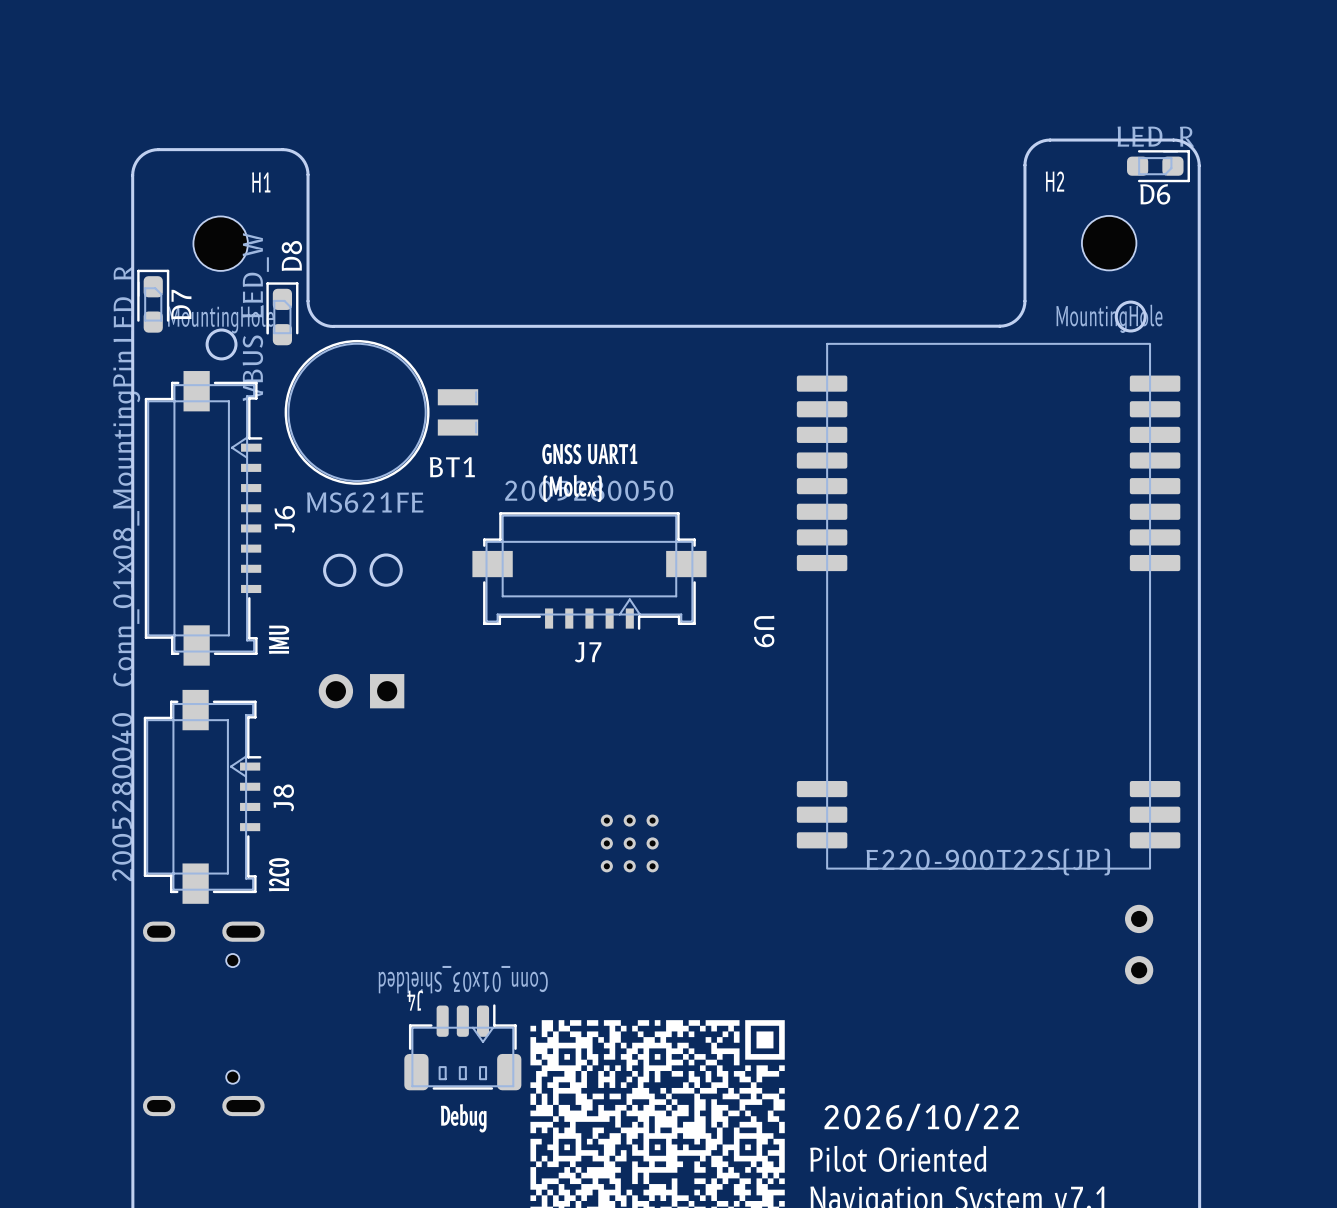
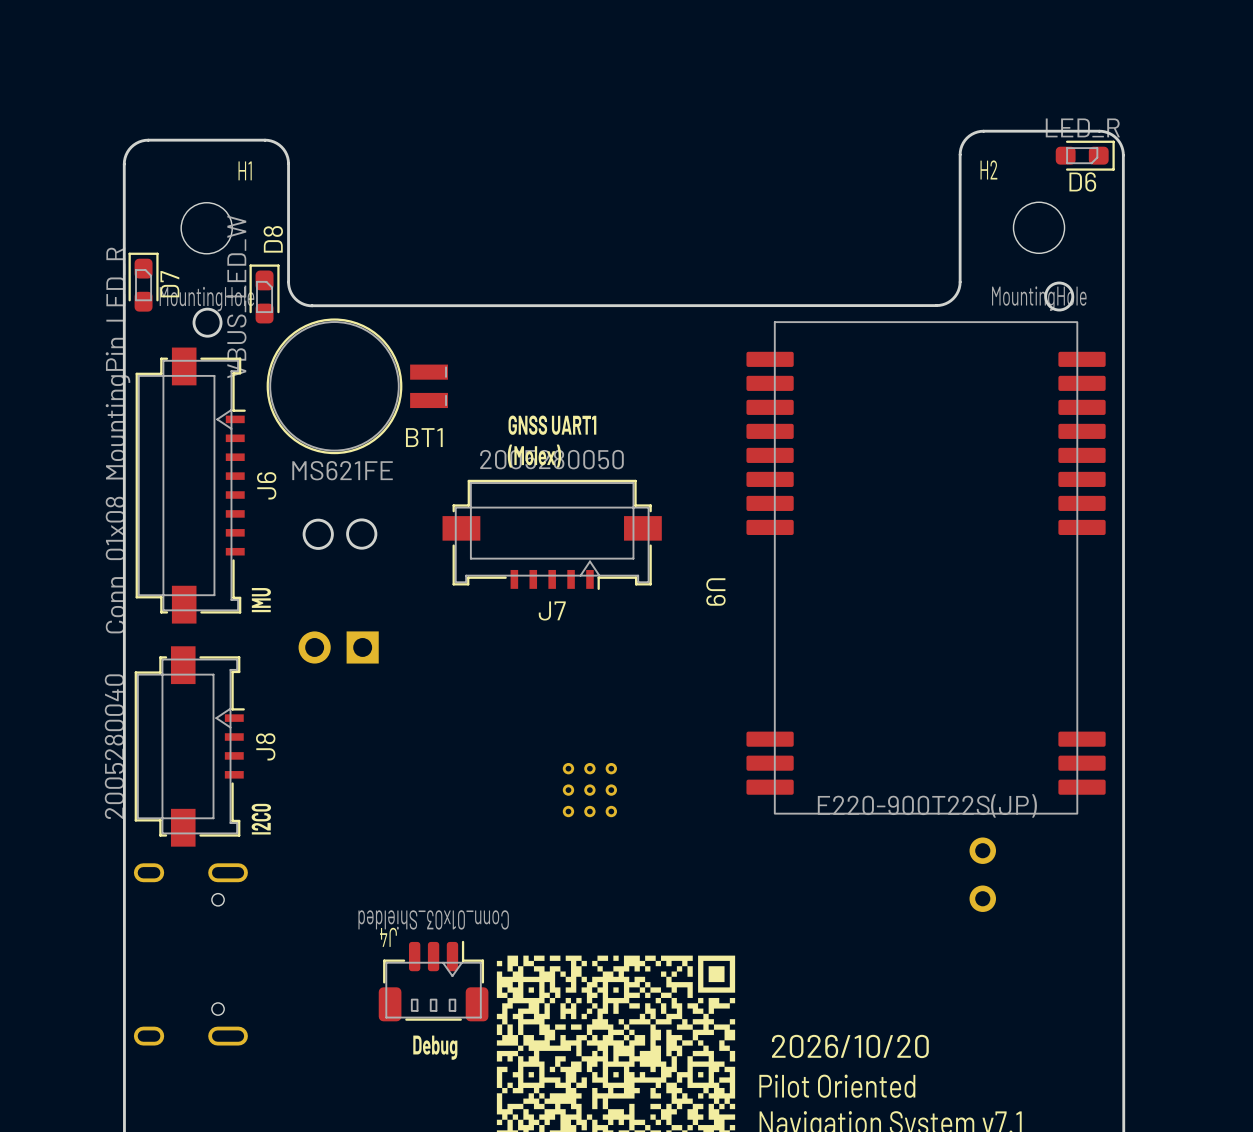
part position: (1139, 944) -> (982, 874)
text: 2026/10/22 (921, 1117) -> 2026/10/20 (850, 1046)

